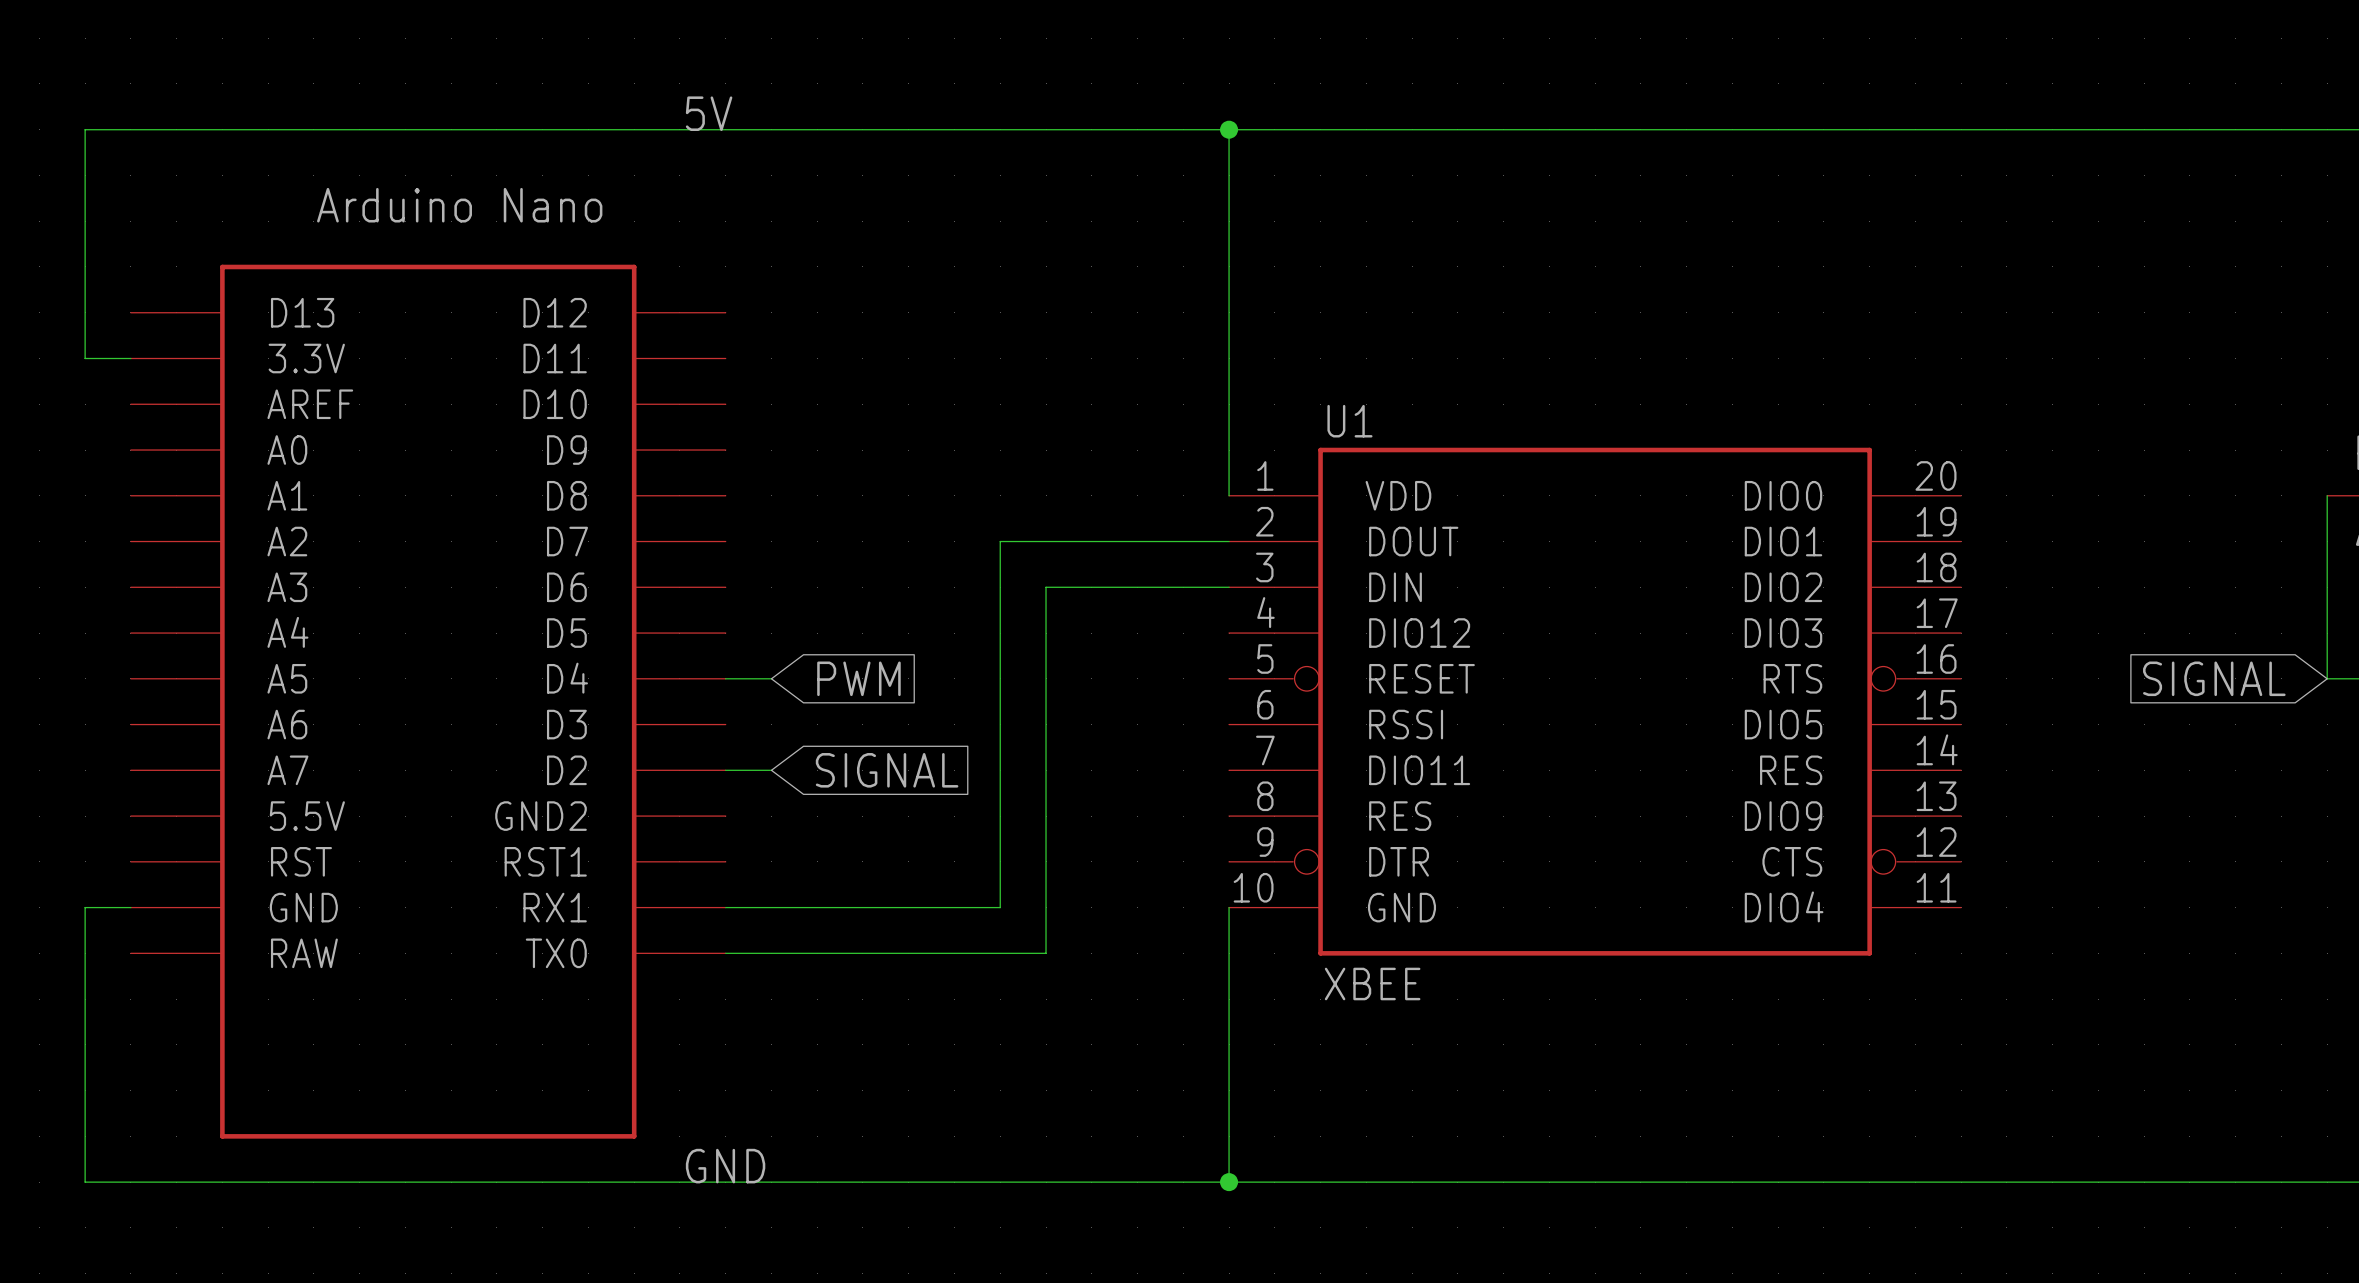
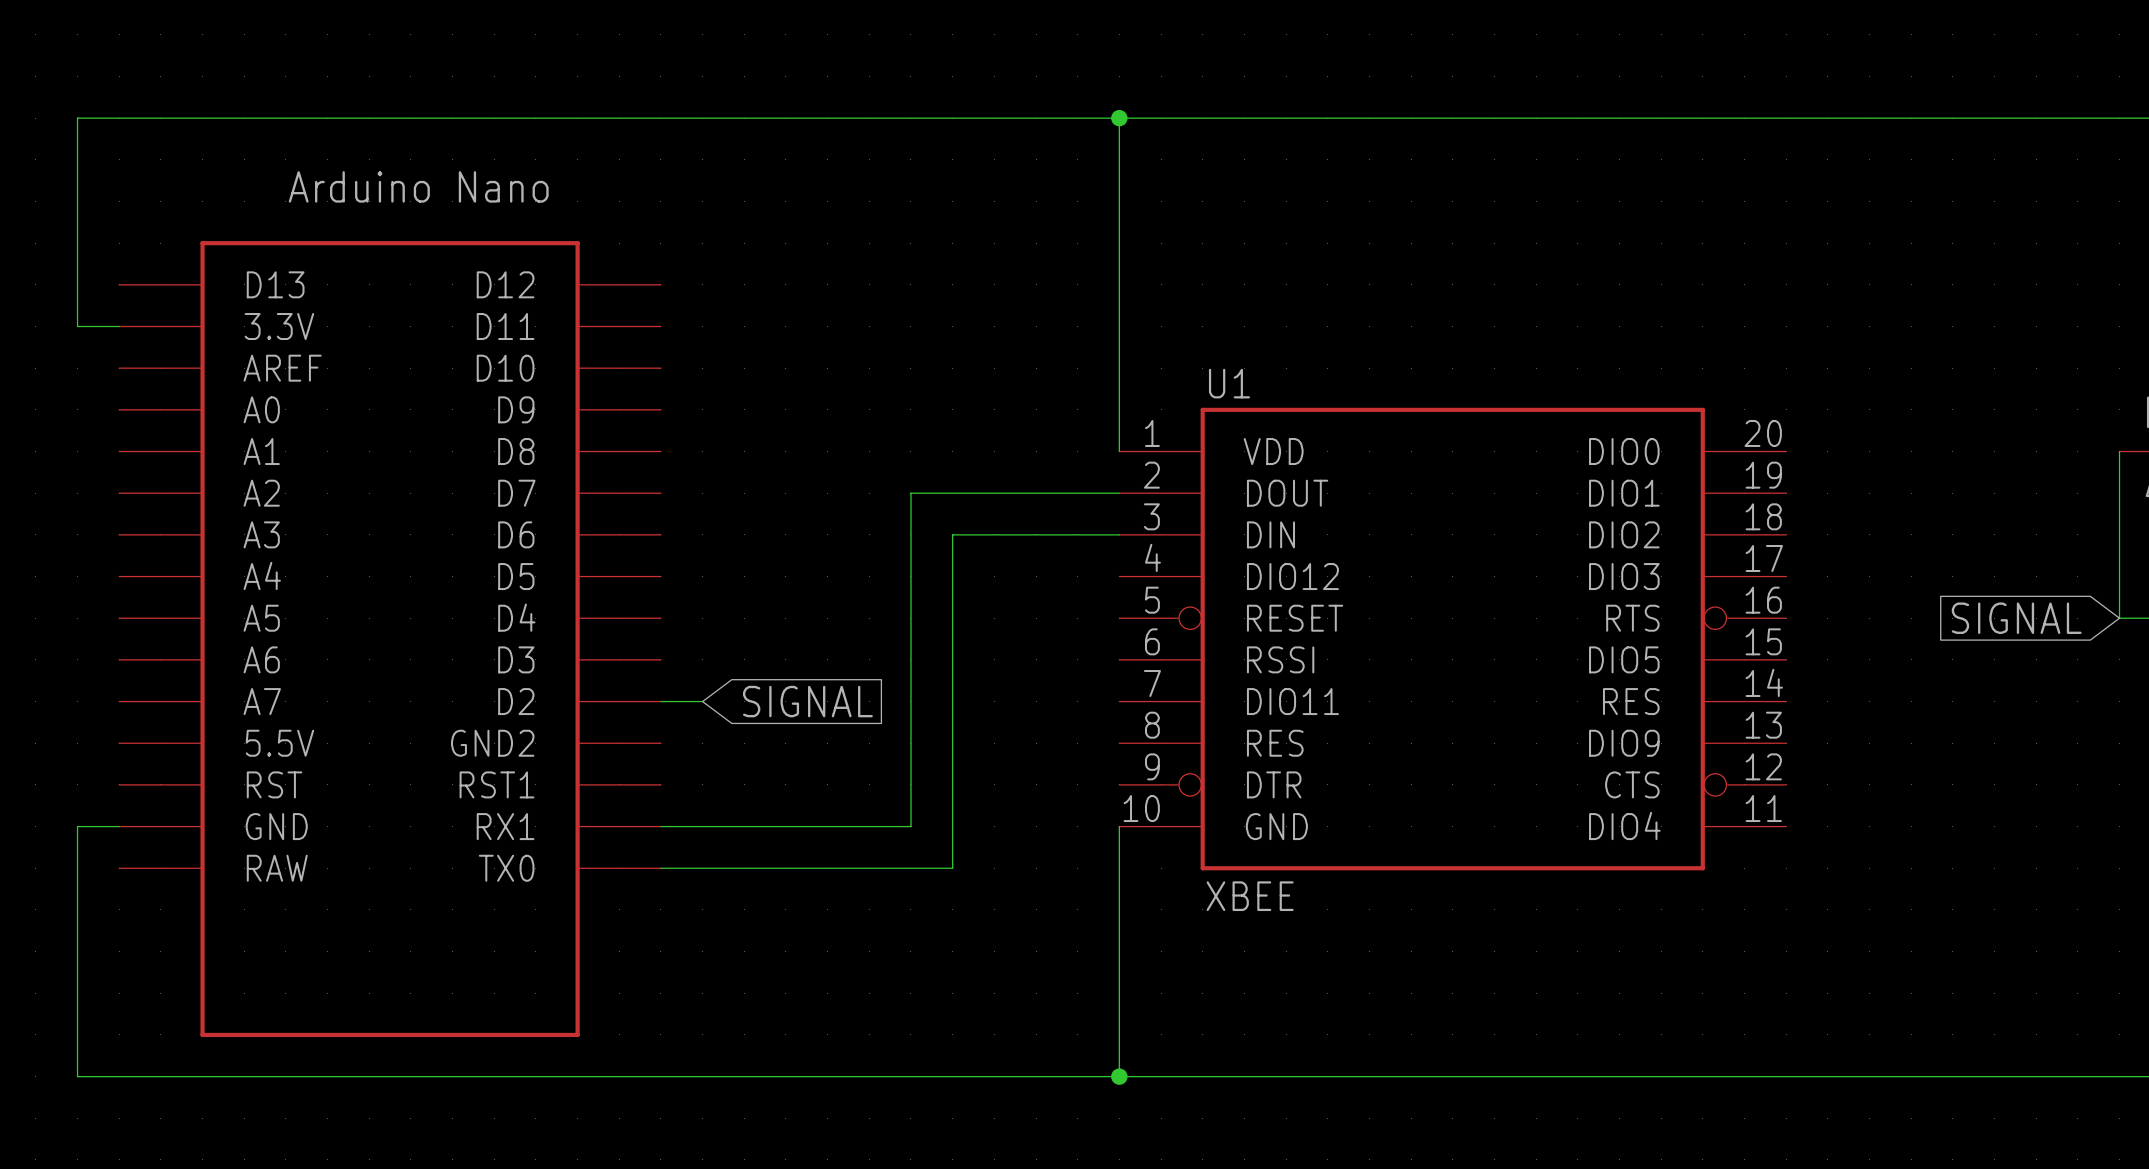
label: 5V (709, 113) -> none
wire: (725, 678) (771, 678) -> none
global label: PWM (858, 678) -> none
label: GND (725, 1166) -> none

